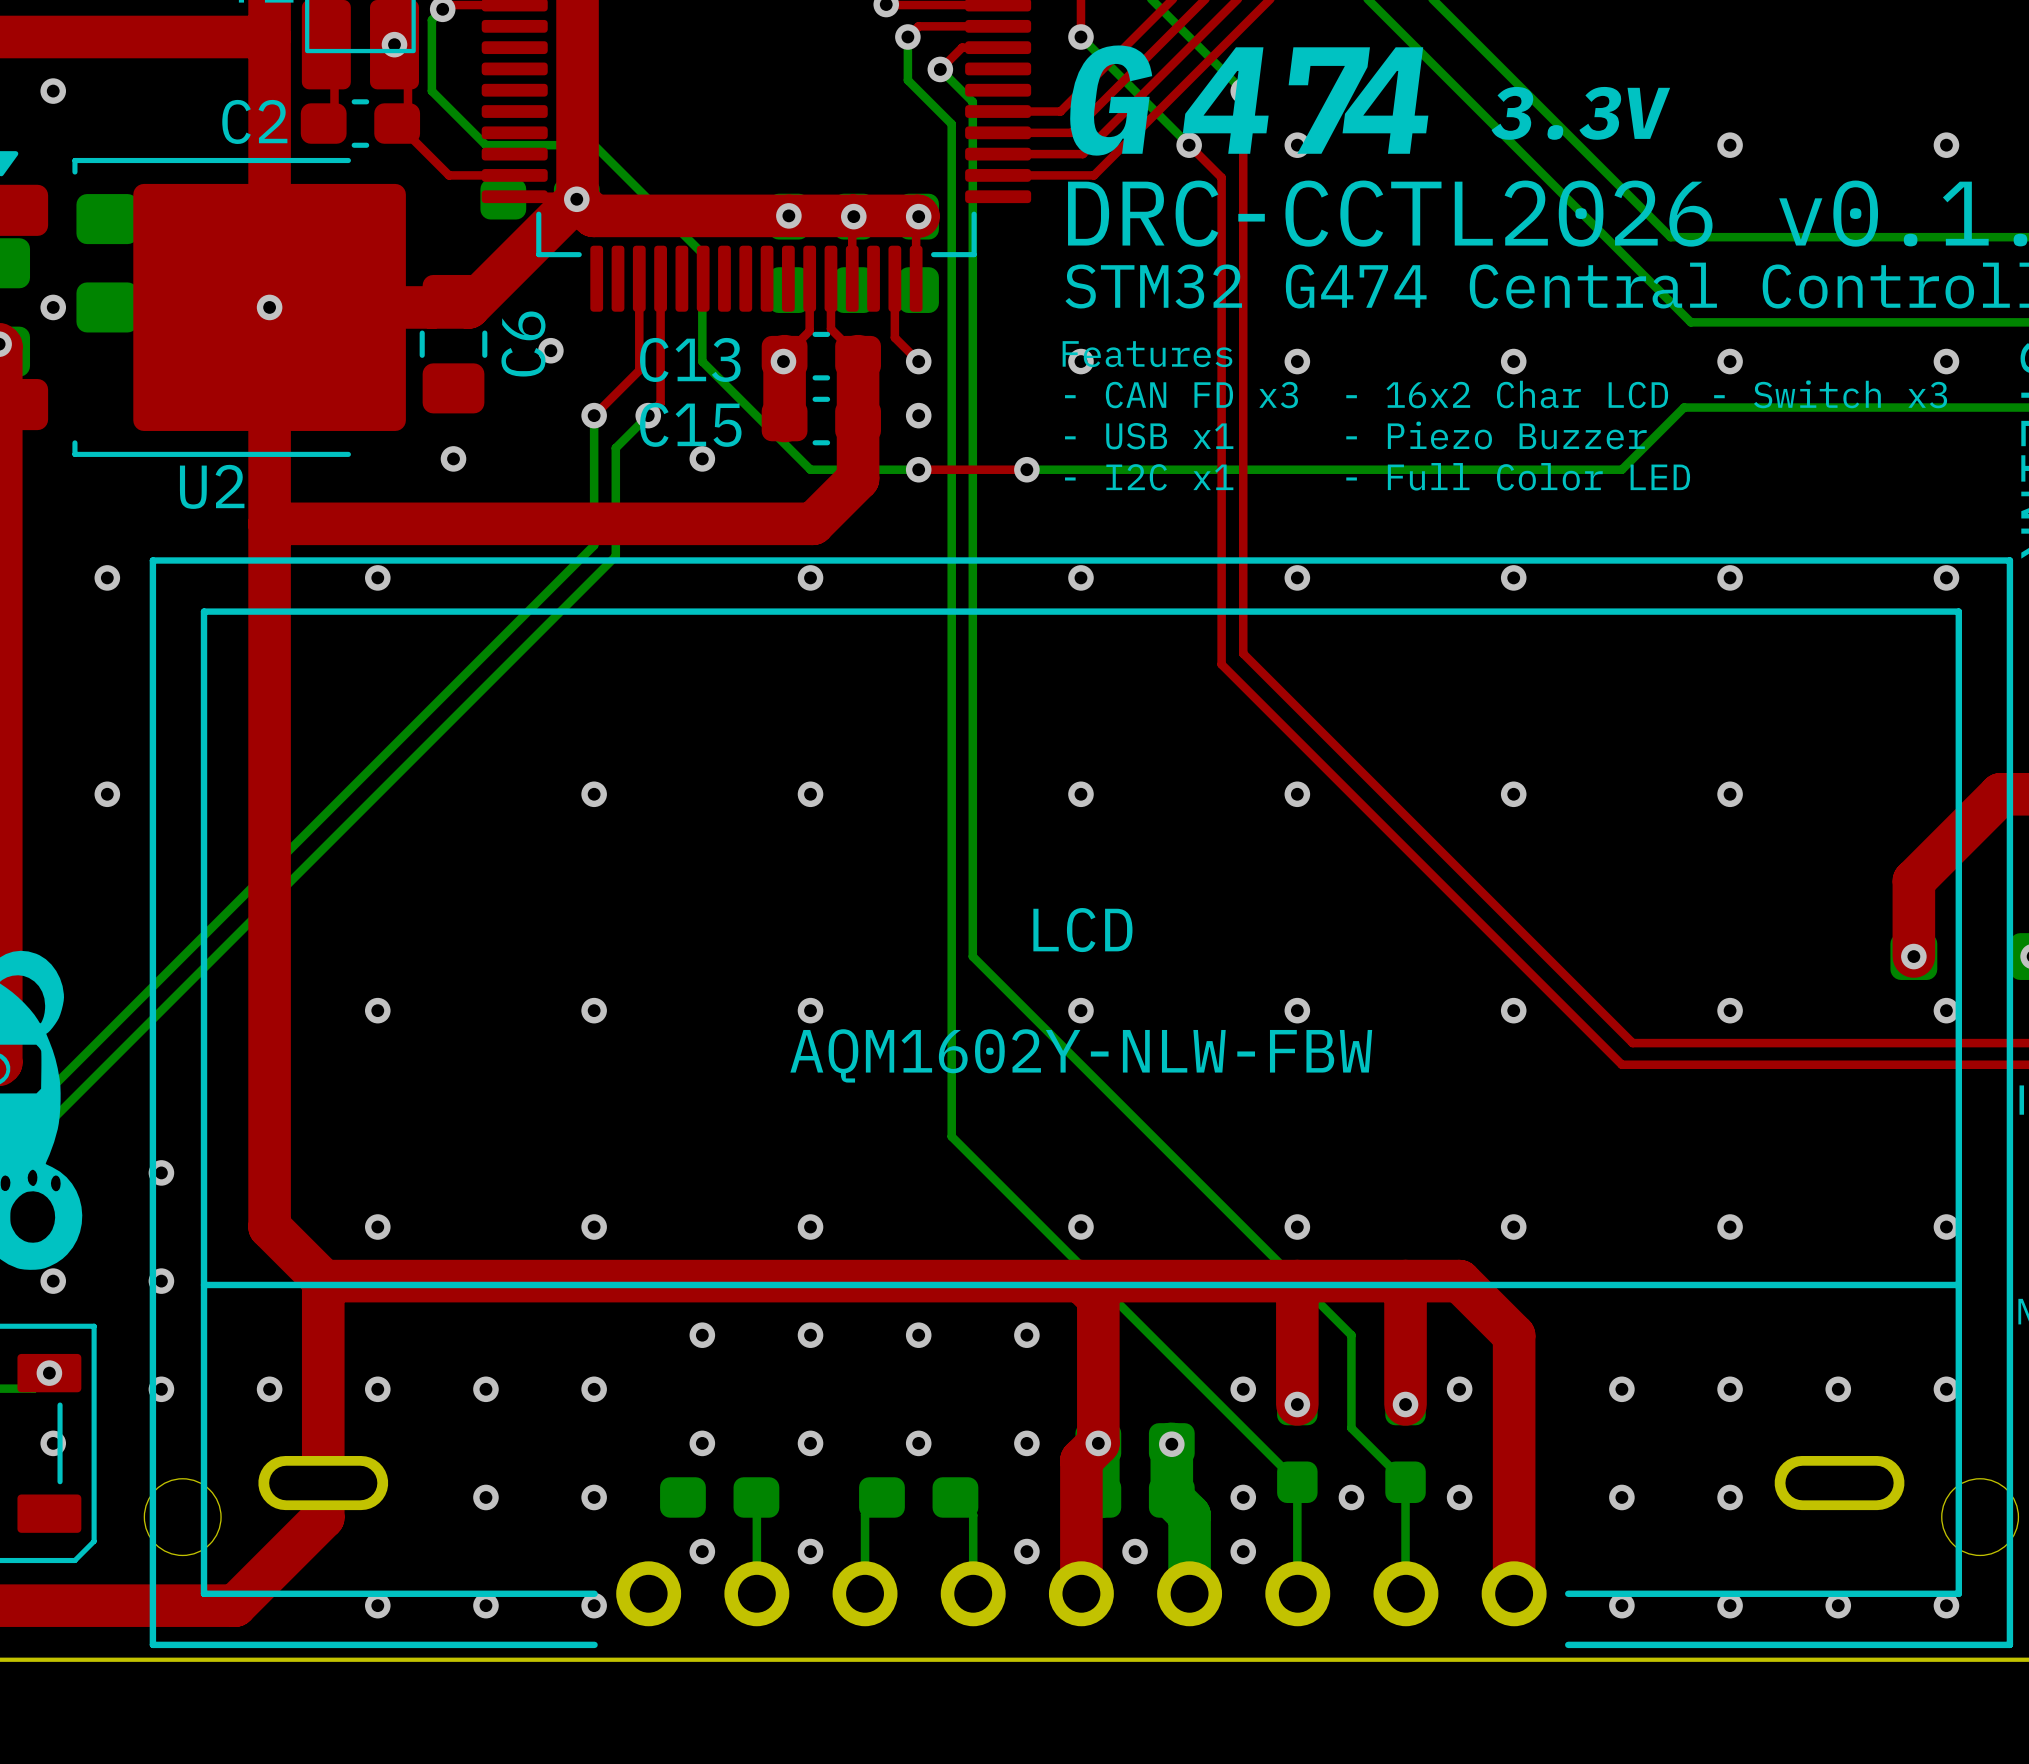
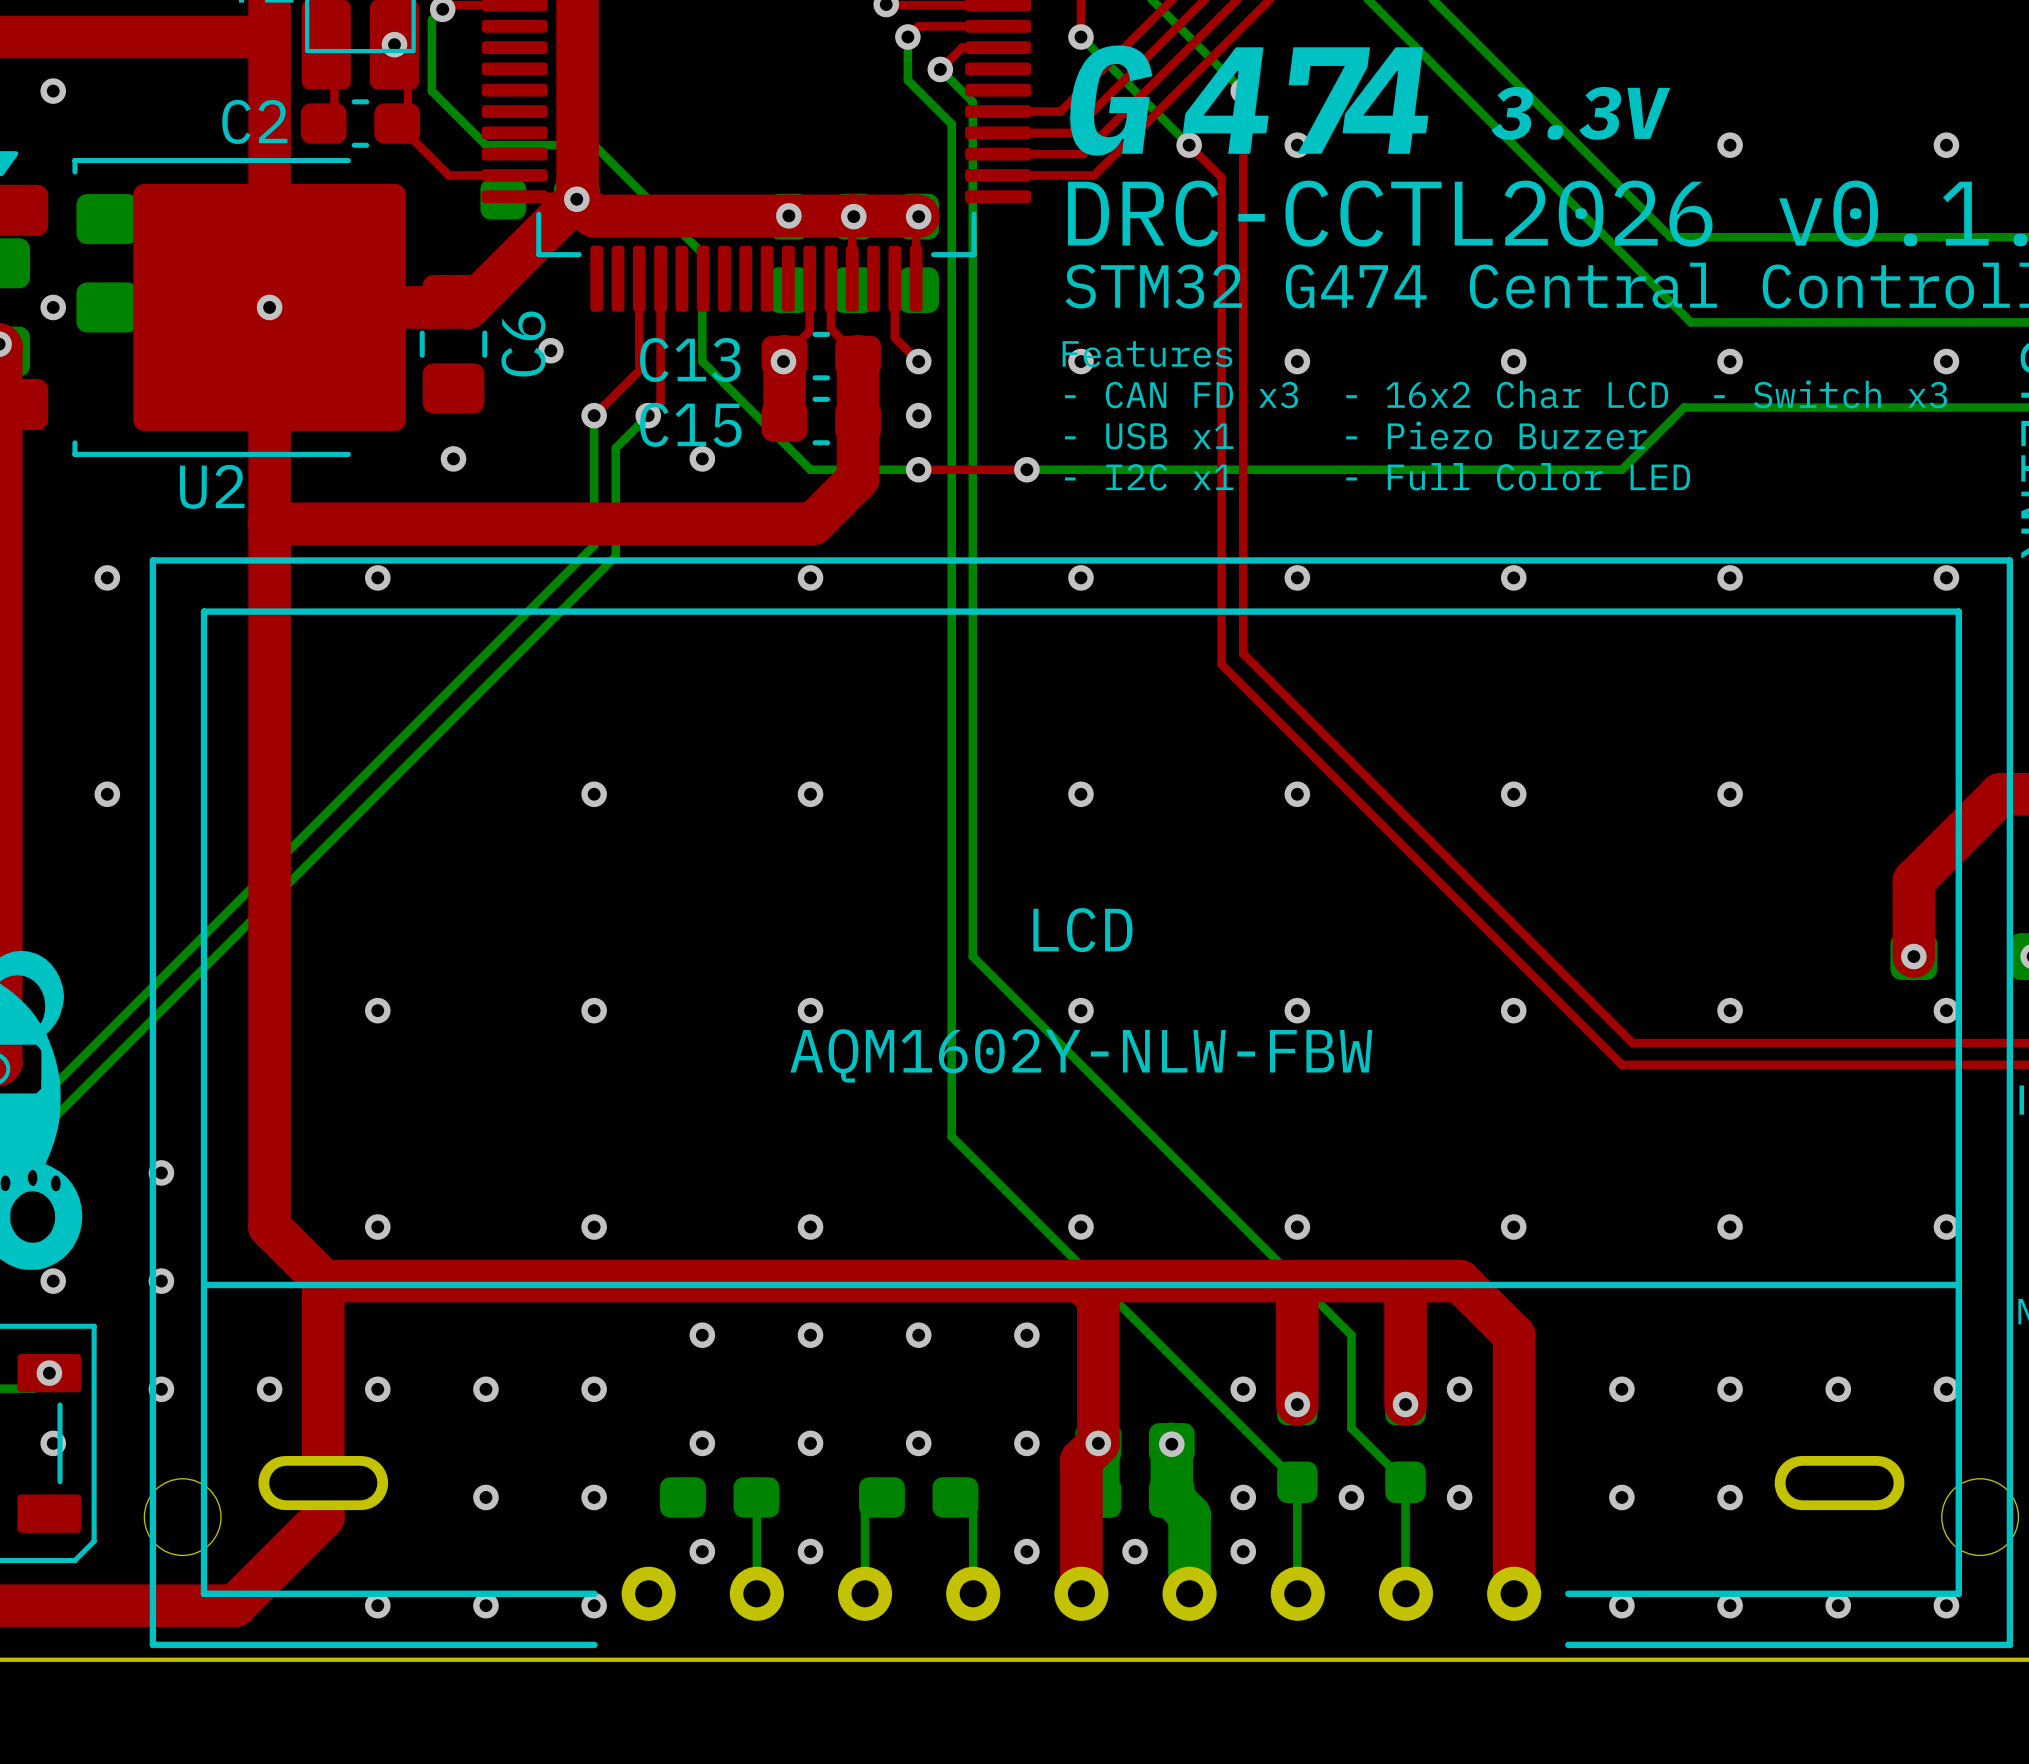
part footprint: [144, 557, 2019, 1649] -> [144, 557, 2019, 1649]

